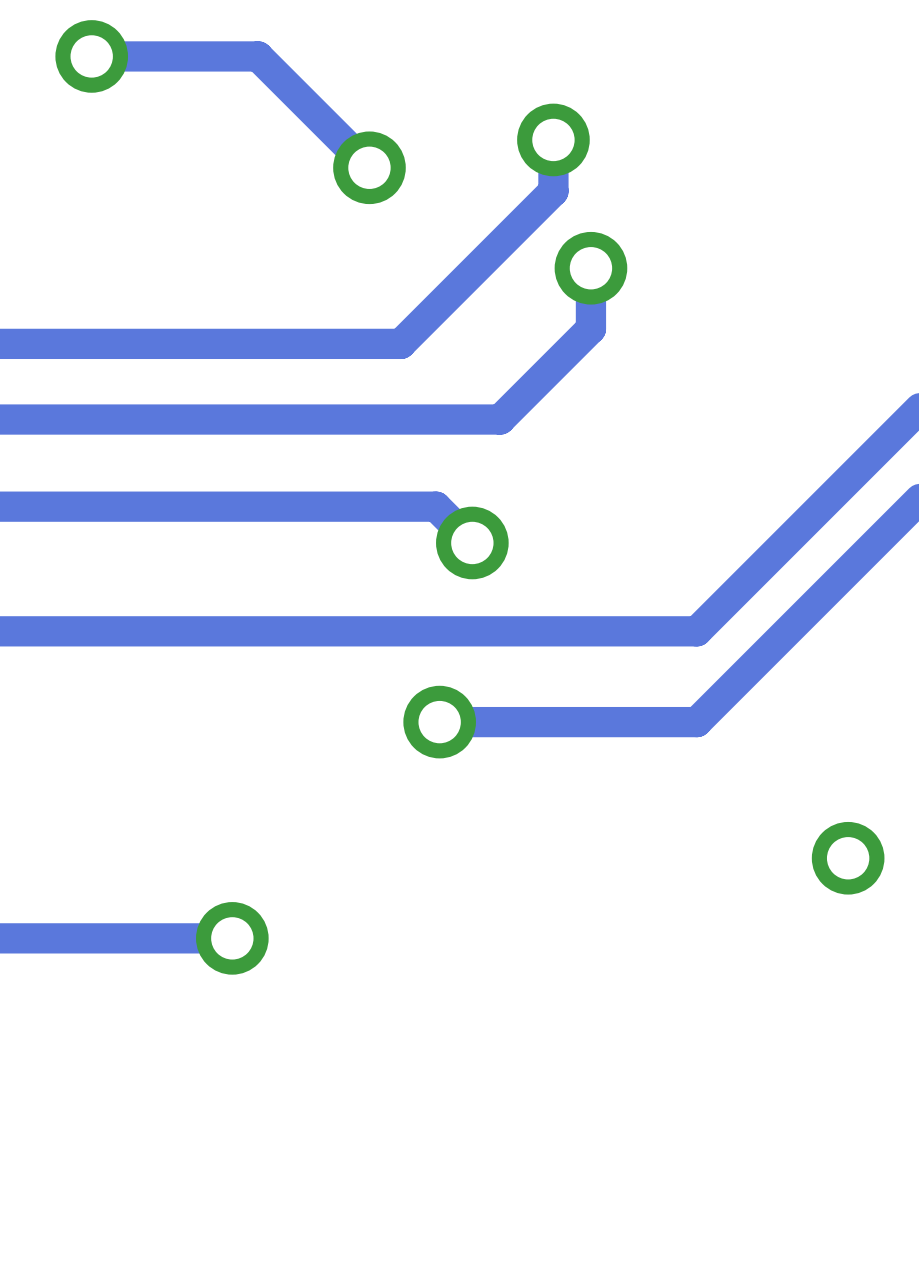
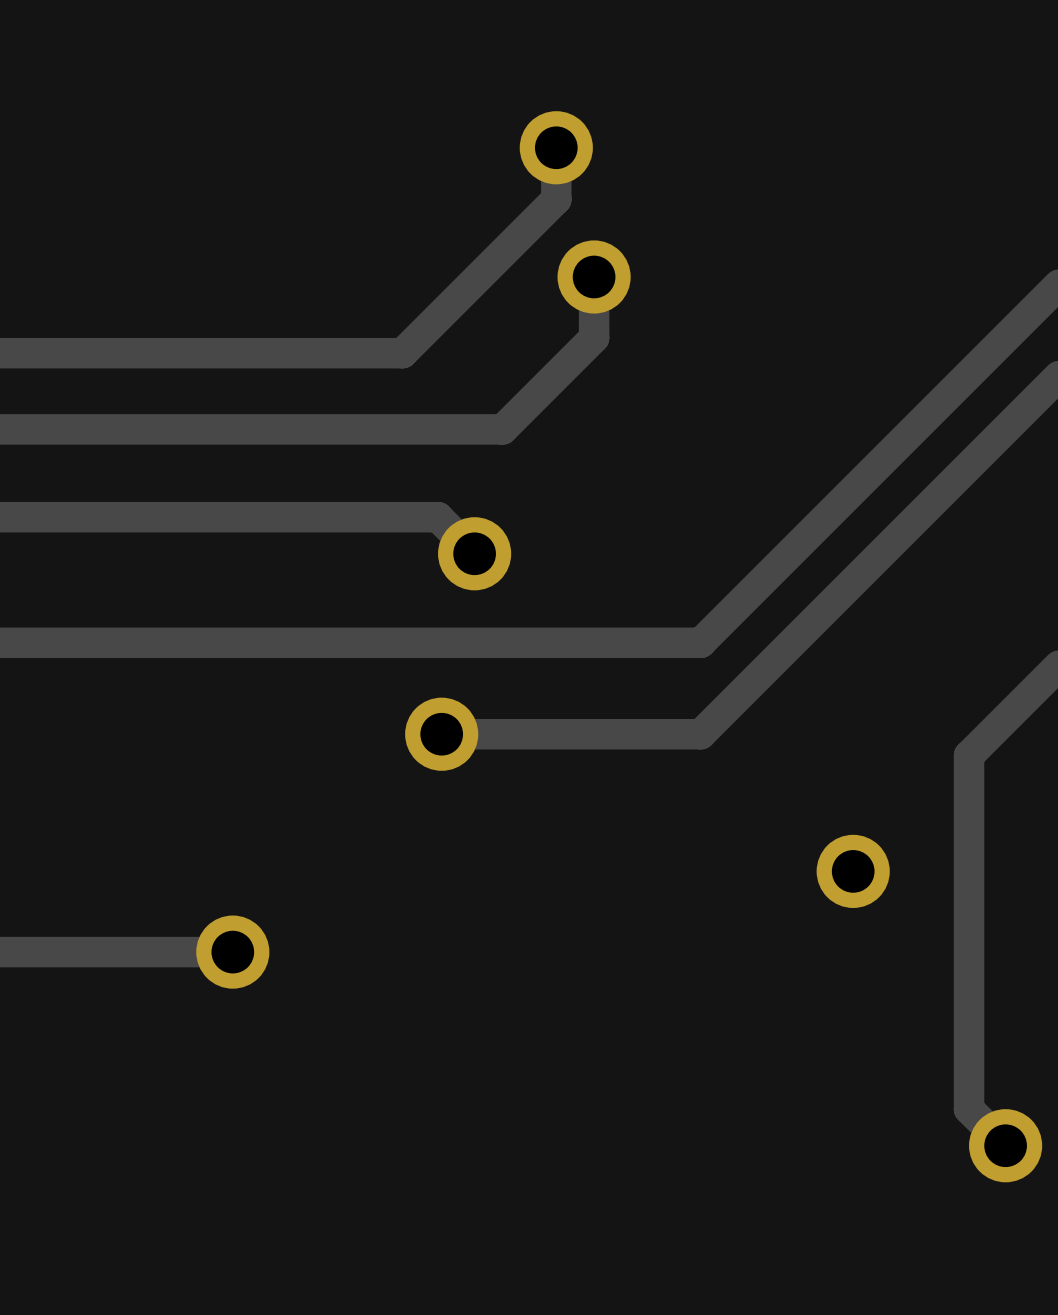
track: (91, 56) (258, 56) (369, 167) -> none
via: (91, 56) -> none
via: (369, 167) -> none

